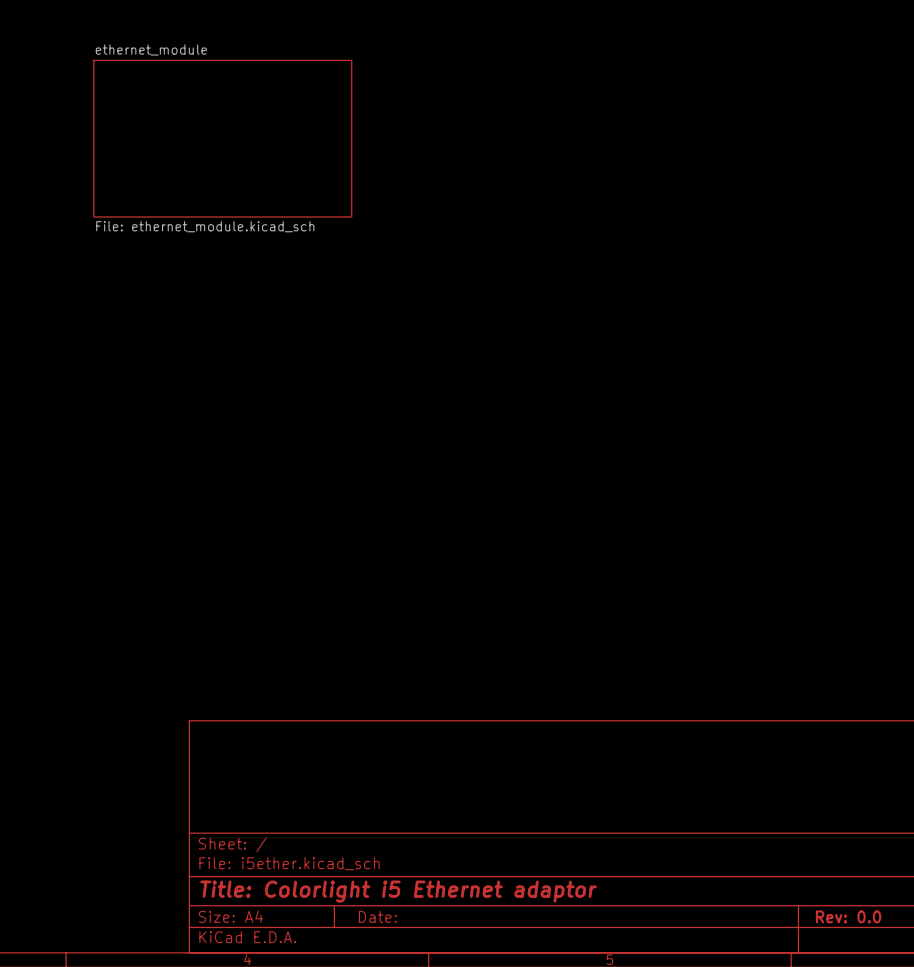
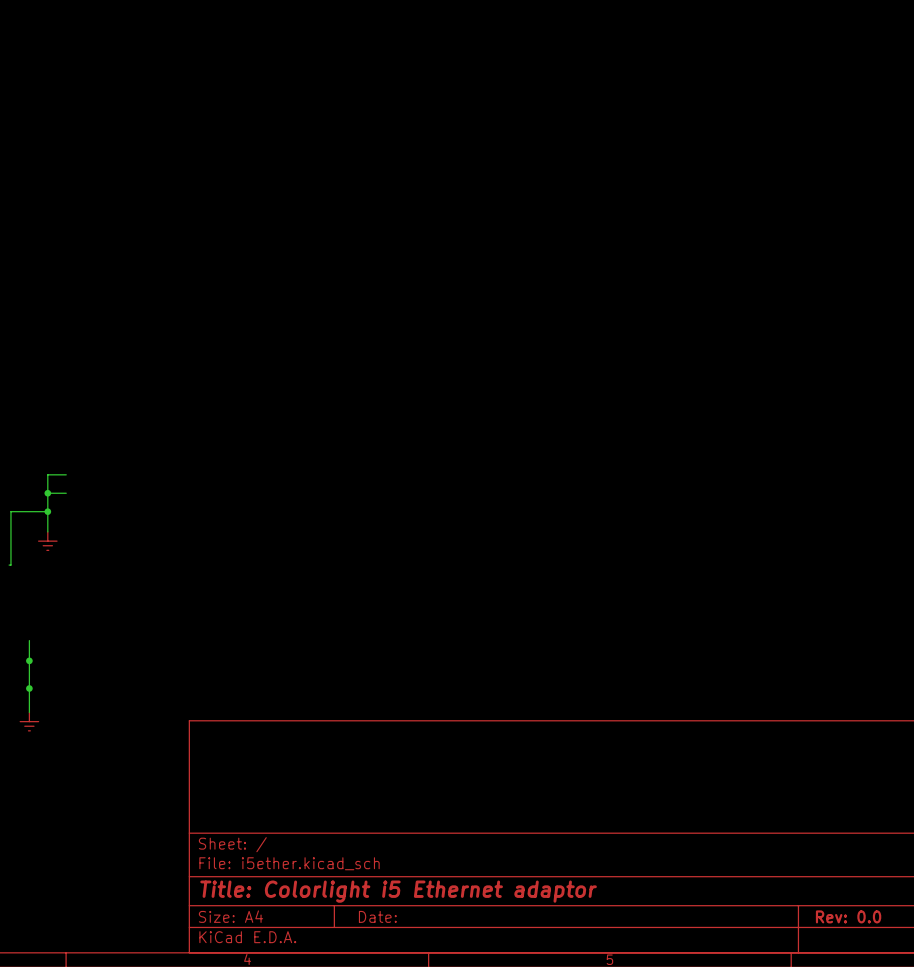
sheet ethernet_module: File: ethernet_module.kicad_sch (222, 138) -> none
wire: none -> (66, 474) (47, 474) (47, 531)
wire: none -> (47, 493) (66, 493)
junction: none -> (47, 493)
wire: none -> (47, 511) (10, 511) (10, 565) (9, 565)
junction: none -> (47, 511)
power symbol: none -> (47, 541)
wire: none -> (29, 640) (29, 712)
junction: none -> (29, 660)
junction: none -> (29, 688)
power symbol: none -> (29, 721)

